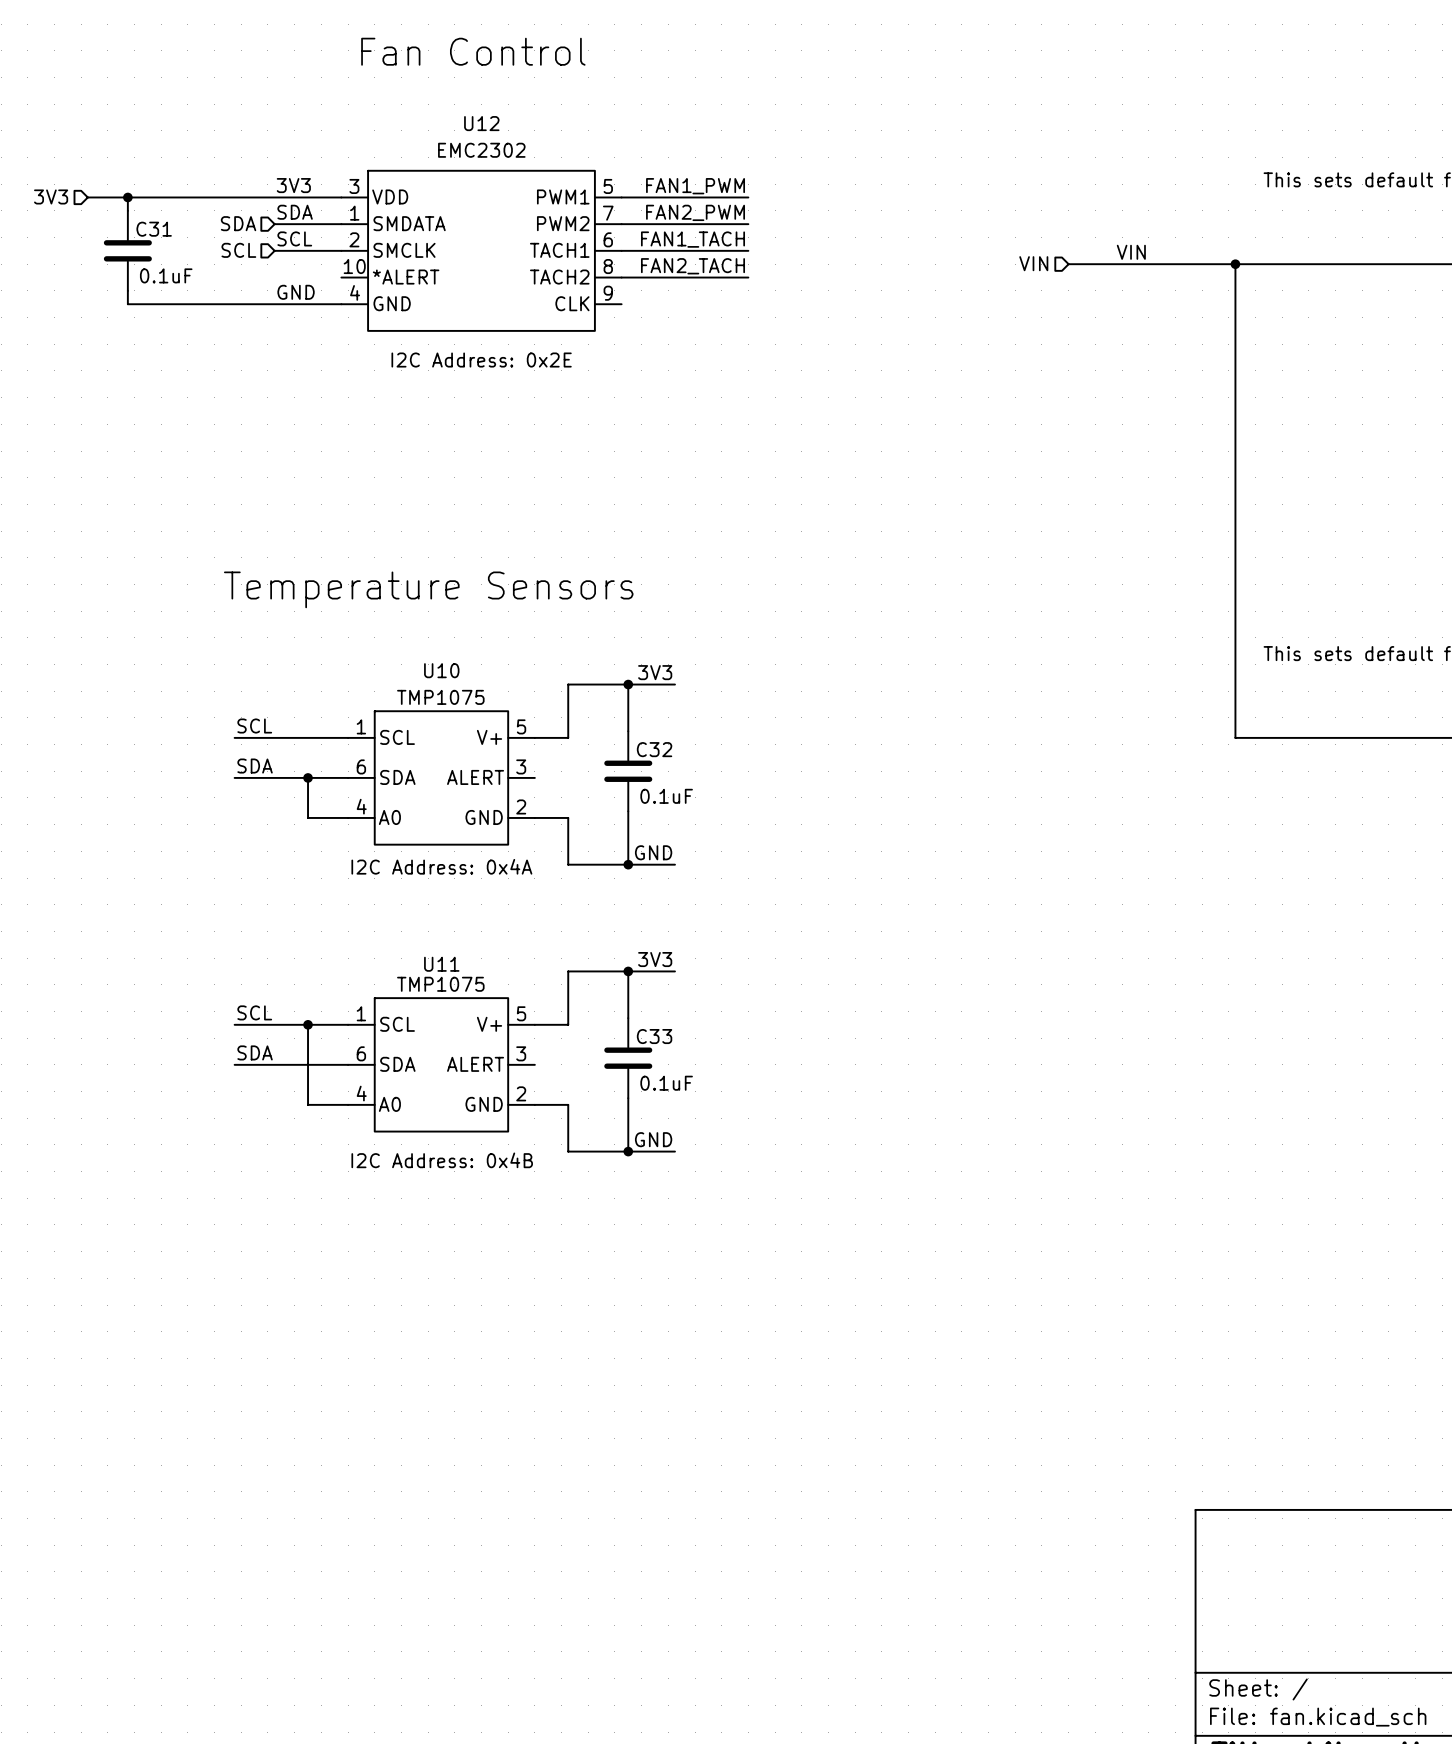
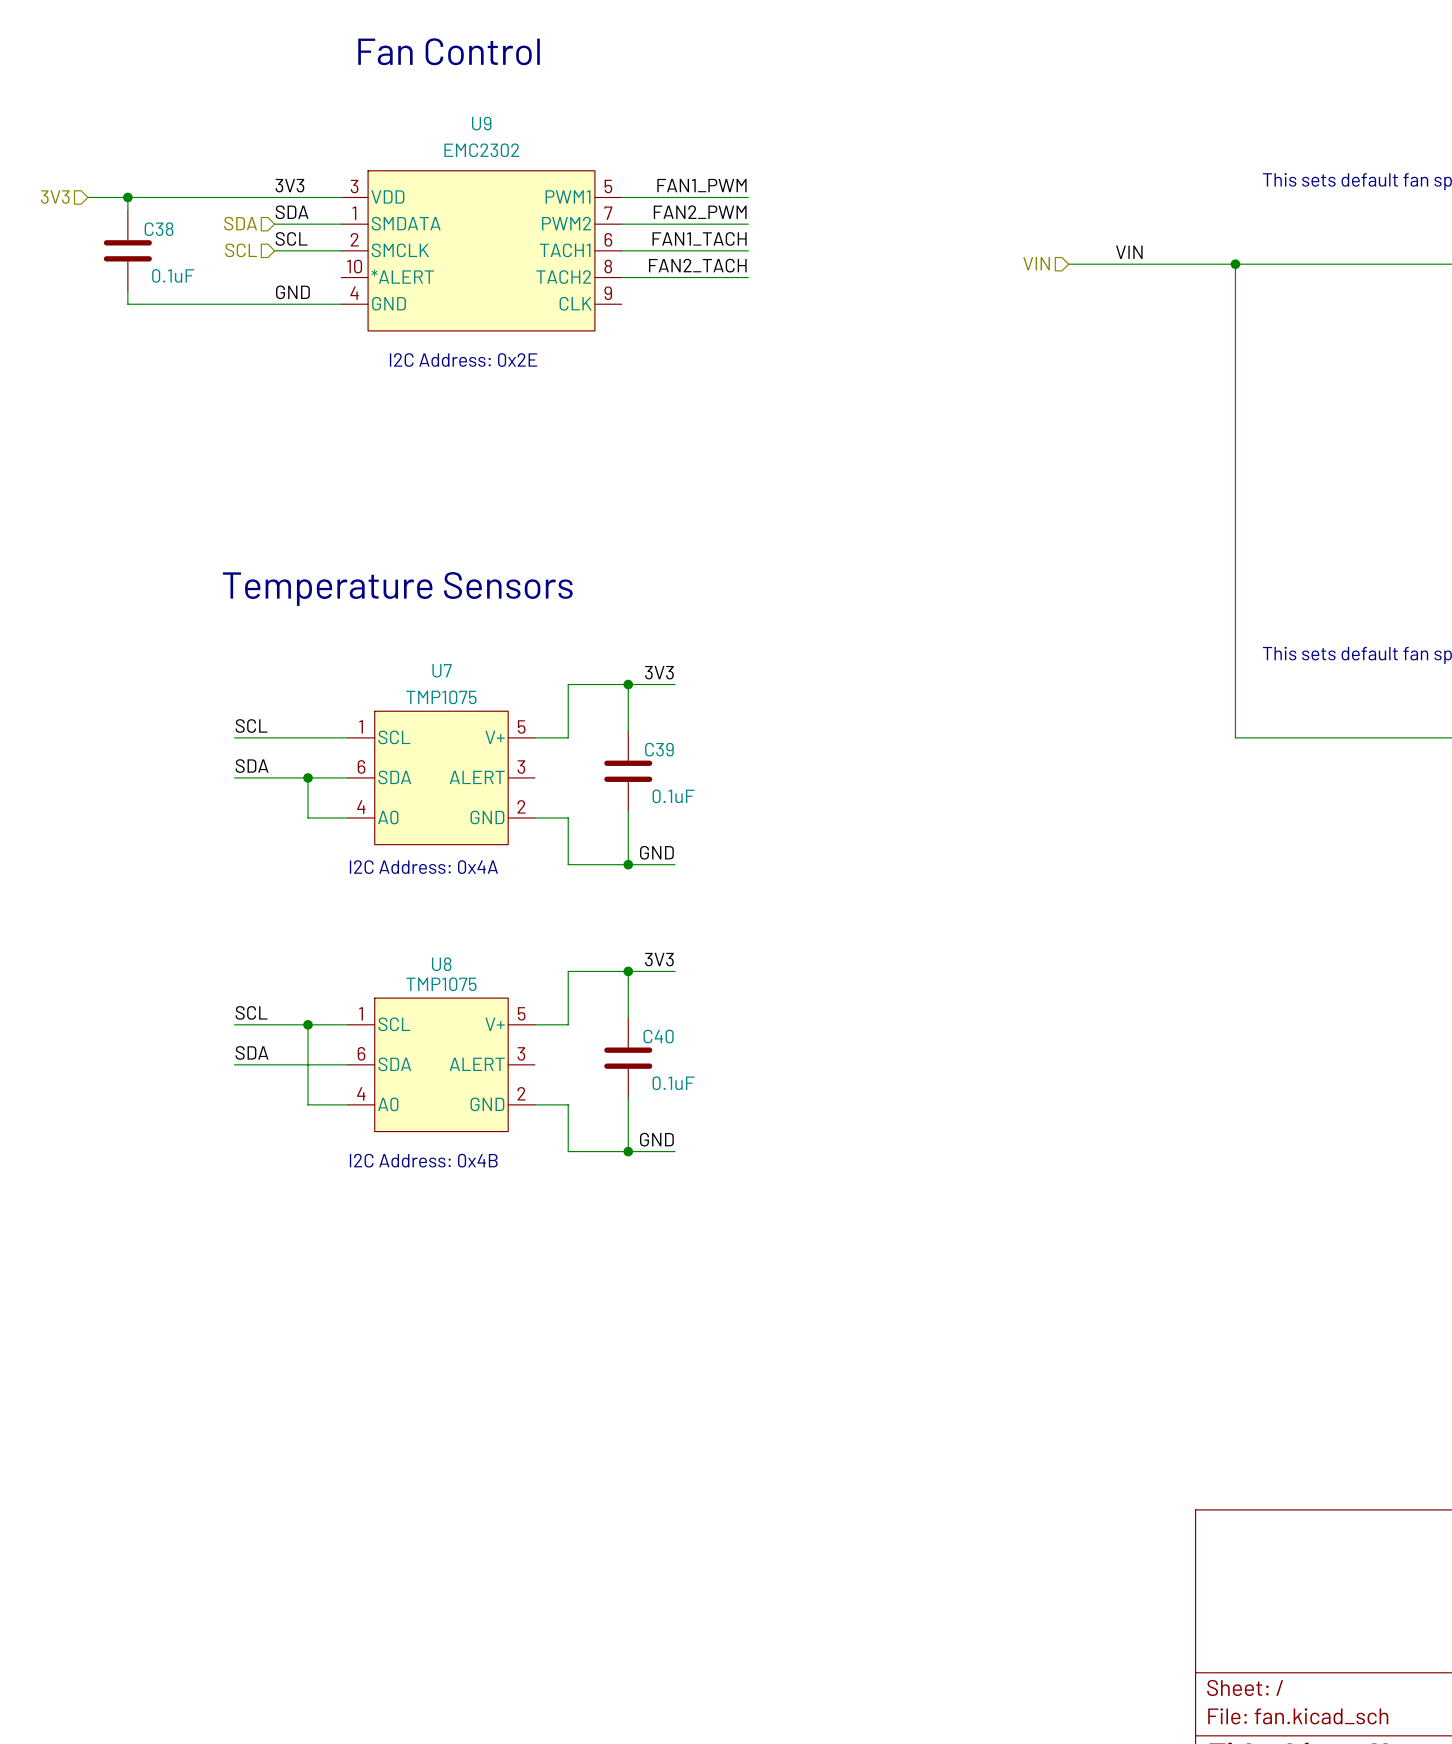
U12 name: U12 (481, 123) -> U9 (481, 123)
C31 name: C31 (154, 229) -> C38 (159, 229)
U10 name: U10 (441, 670) -> U7 (442, 670)
C32 name: C32 (654, 749) -> C39 (659, 749)
U11 name: U11 (441, 964) -> U8 (441, 964)
C33 name: C33 (654, 1036) -> C40 (658, 1036)

